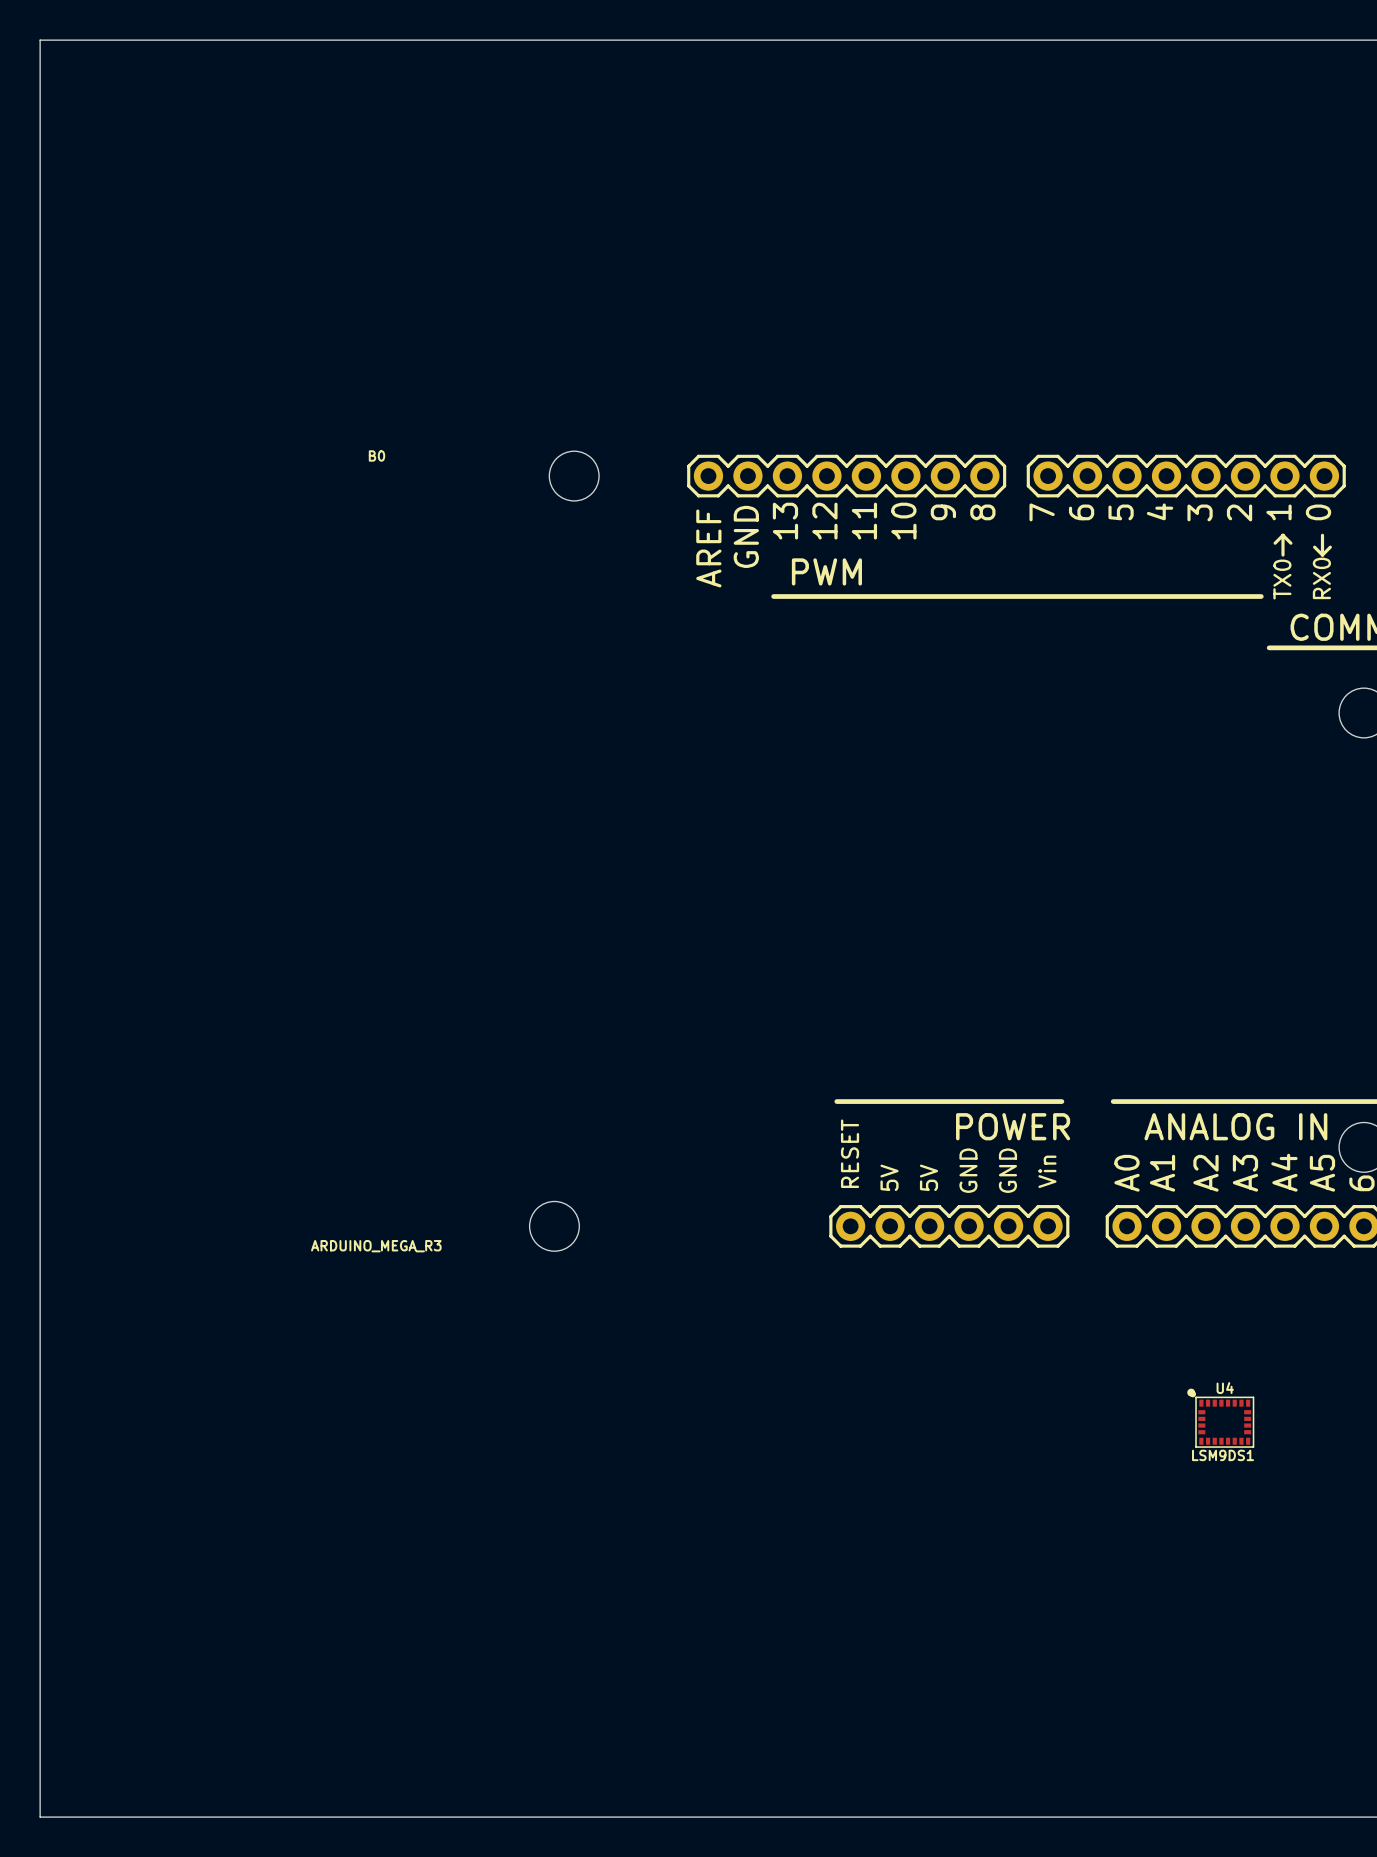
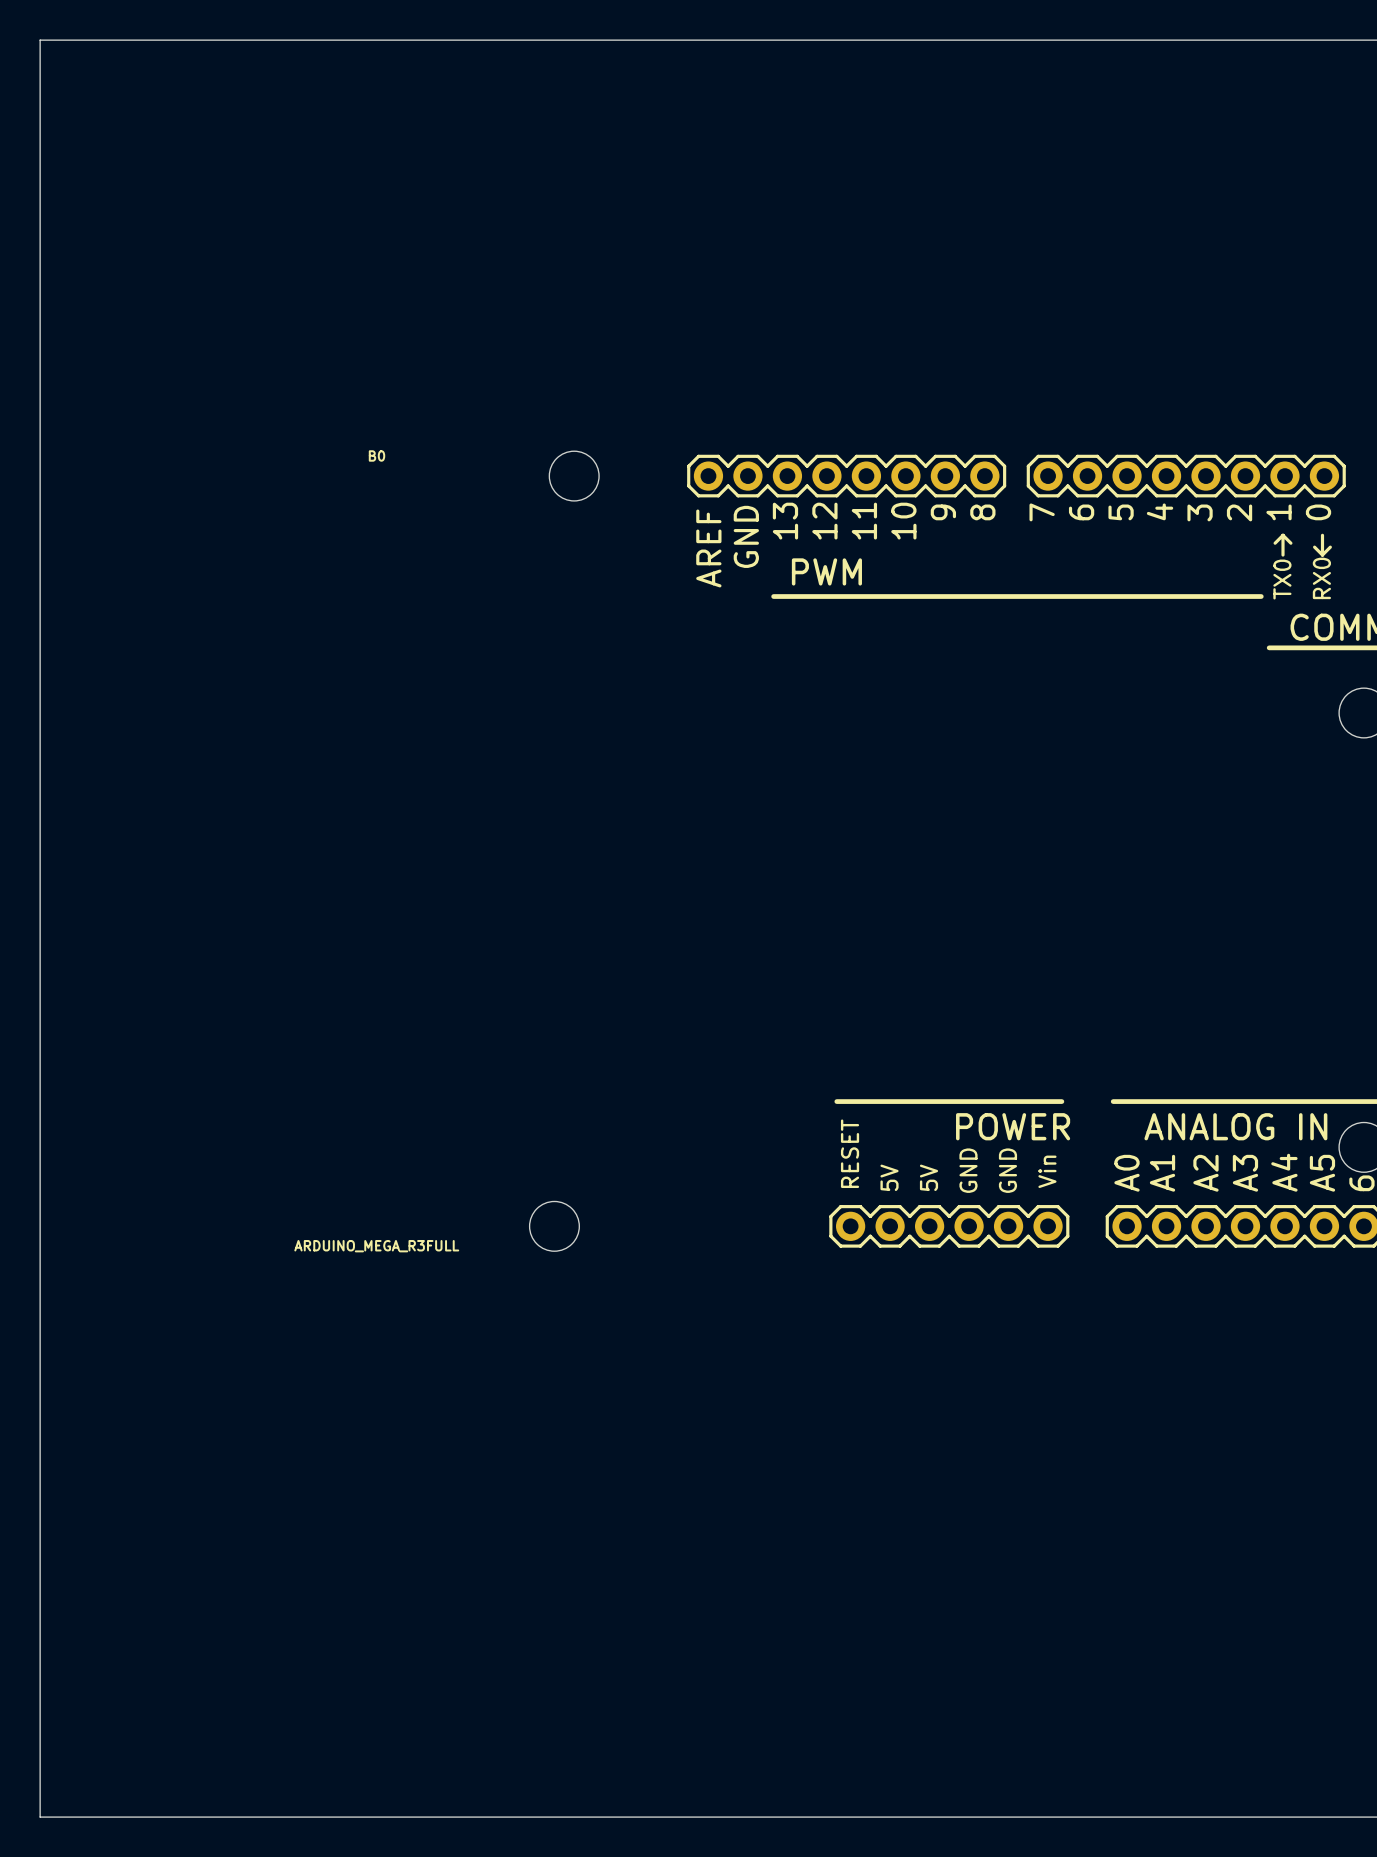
B0 value: ARDUINO_MEGA_R3 (376, 1246) -> ARDUINO_MEGA_R3FULL (376, 1246)
U4: LSM9DS1 (1220, 1418) -> none

